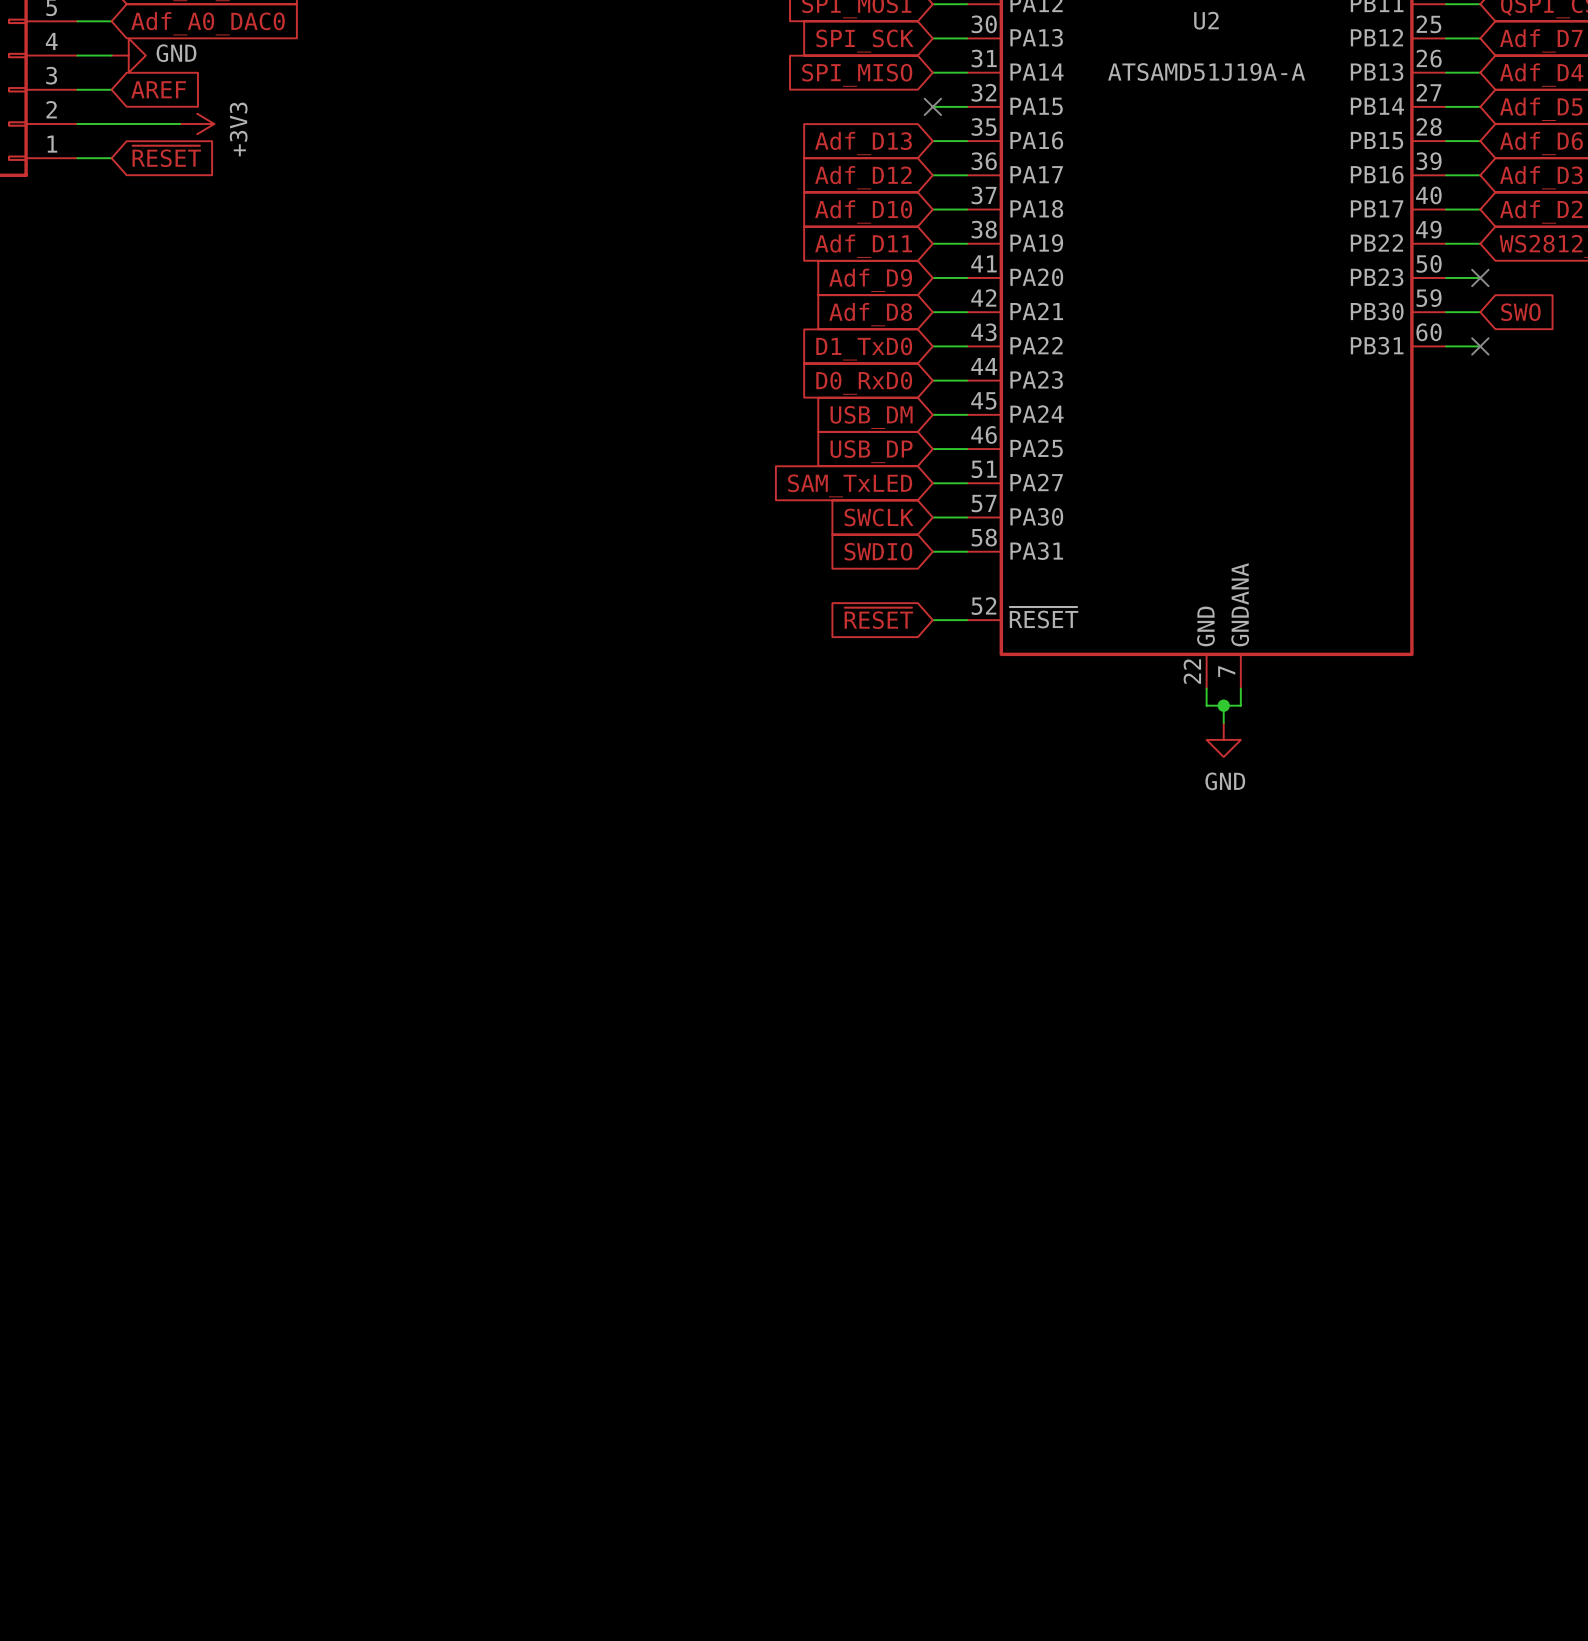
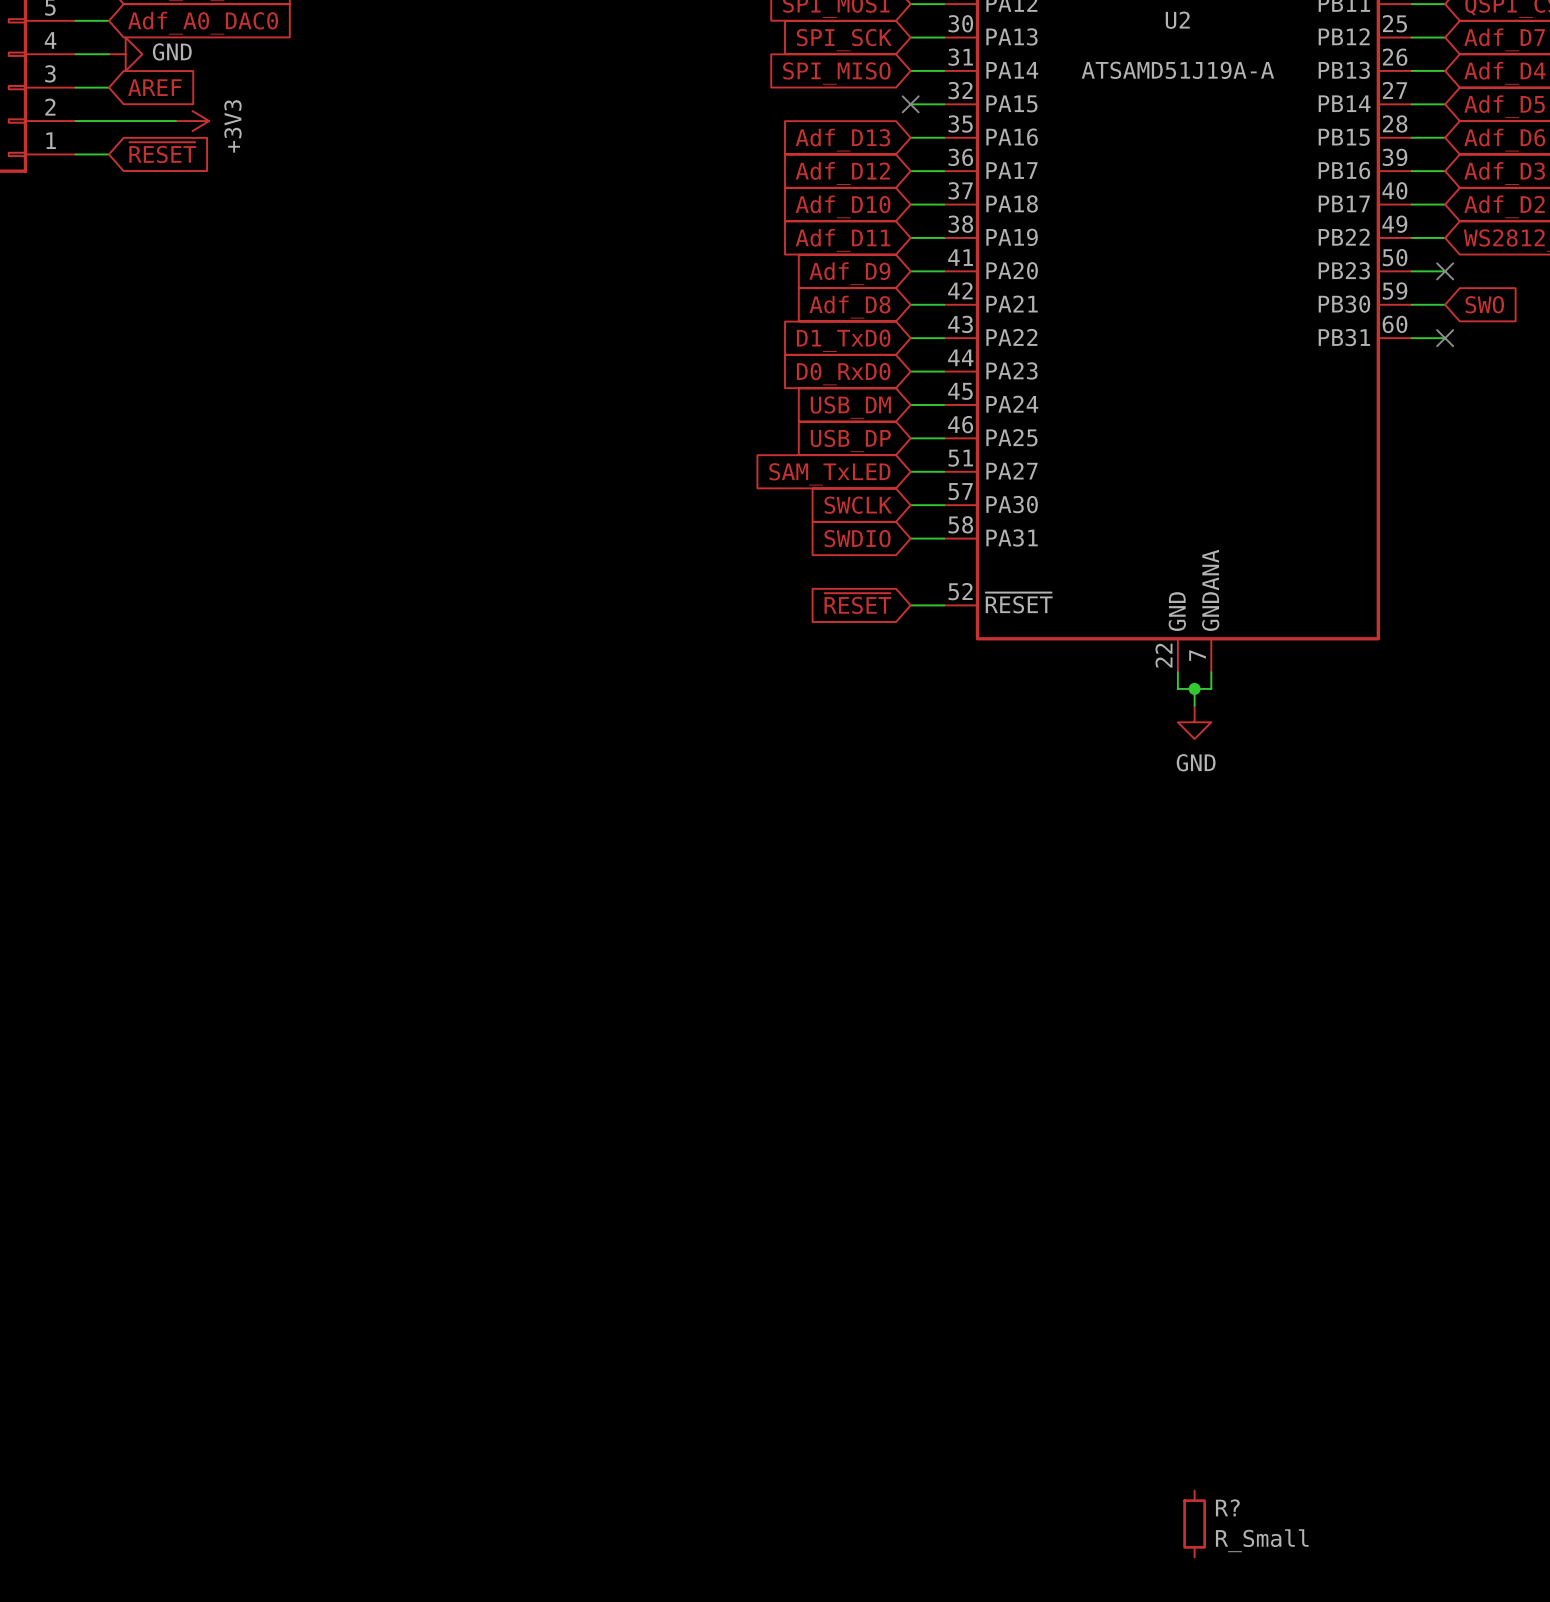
R?: none -> R_Small (1194, 1524)

